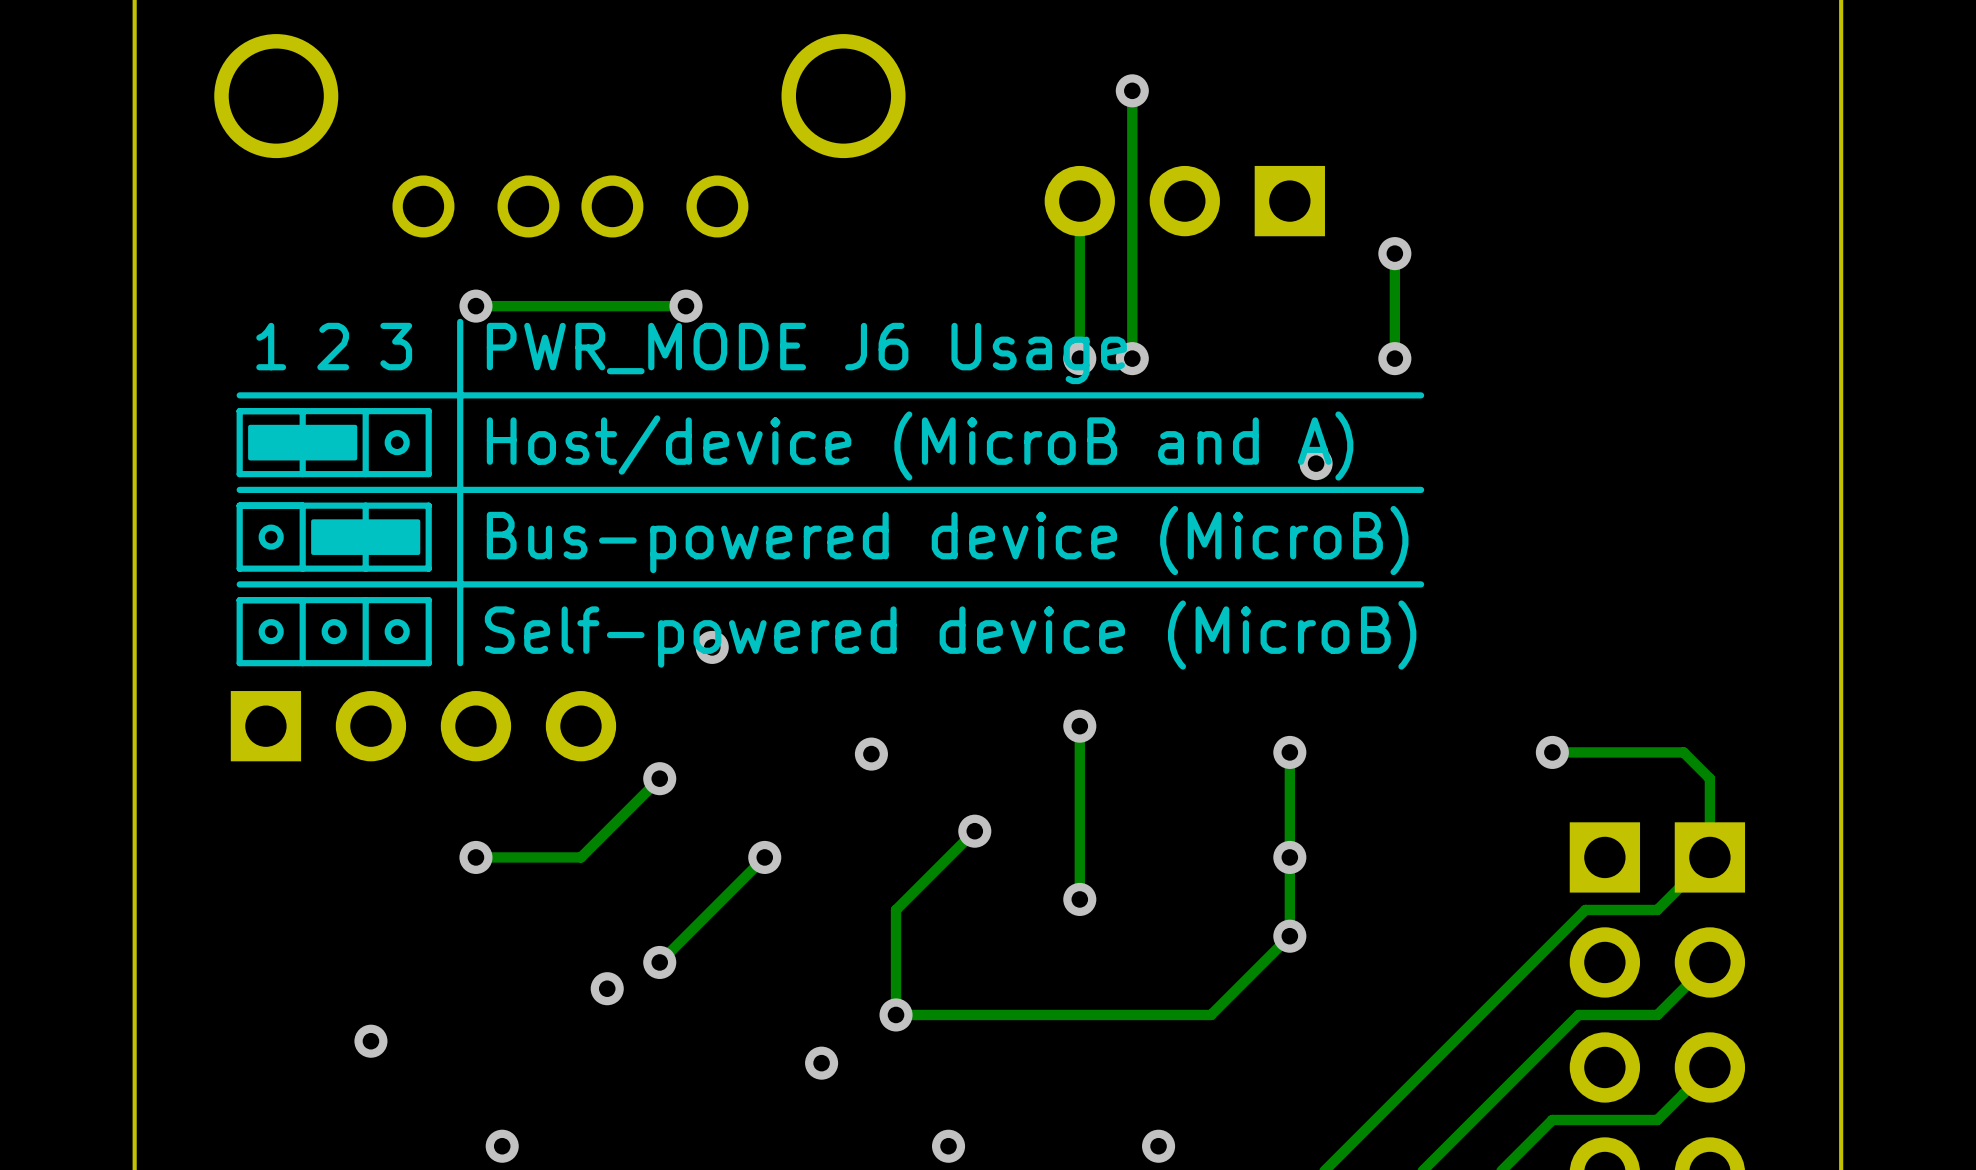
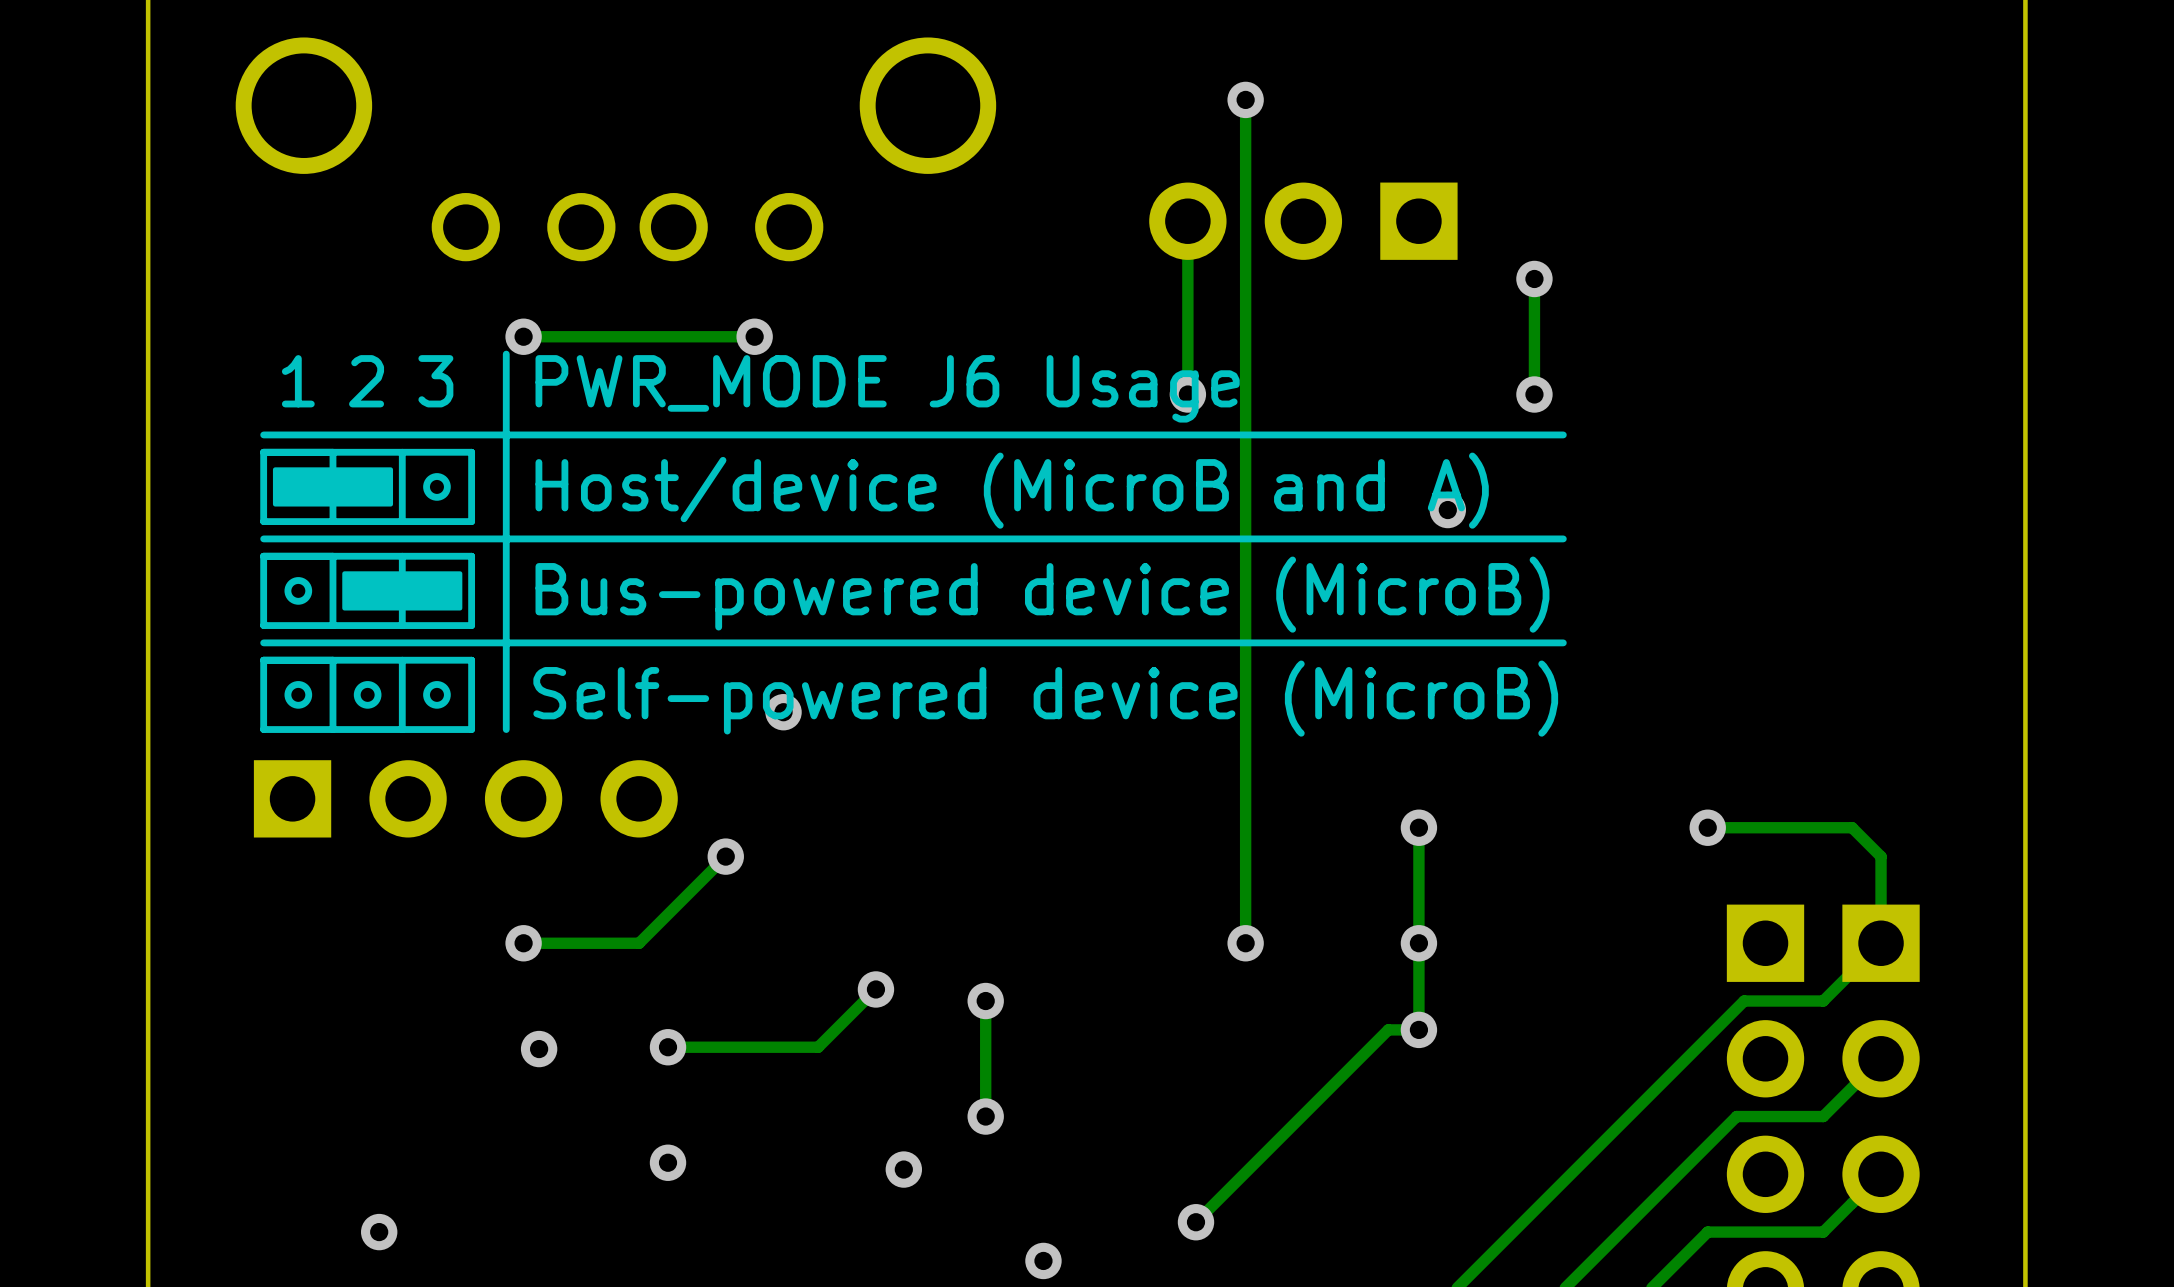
track: none -> (1245, 394) (1245, 943)
via: (1132, 358) -> none
track: (1079, 726) (1079, 909) -> none
via: (1079, 726) -> none
via: (871, 754) -> none
track: (974, 831) (896, 909) -> none
via: (974, 831) -> none
track: (764, 857) (659, 962) -> none
via position: (764, 857) -> (875, 989)
track: none -> (875, 989) (818, 1047) (656, 1047)
via position: (1079, 899) -> (1245, 943)
via: none -> (985, 1001)
track: (1289, 936) (1211, 1014) (896, 1014) -> (1418, 1029) (1388, 1029) (1195, 1222)
via: none -> (668, 1047)
via: none -> (539, 1049)
via: (659, 962) -> none
via: (607, 988) -> none
via: (370, 1041) -> none
via: none -> (668, 1162)
via: none -> (1195, 1222)
via: none -> (379, 1232)
via: (502, 1146) -> none
via: (1158, 1146) -> none

